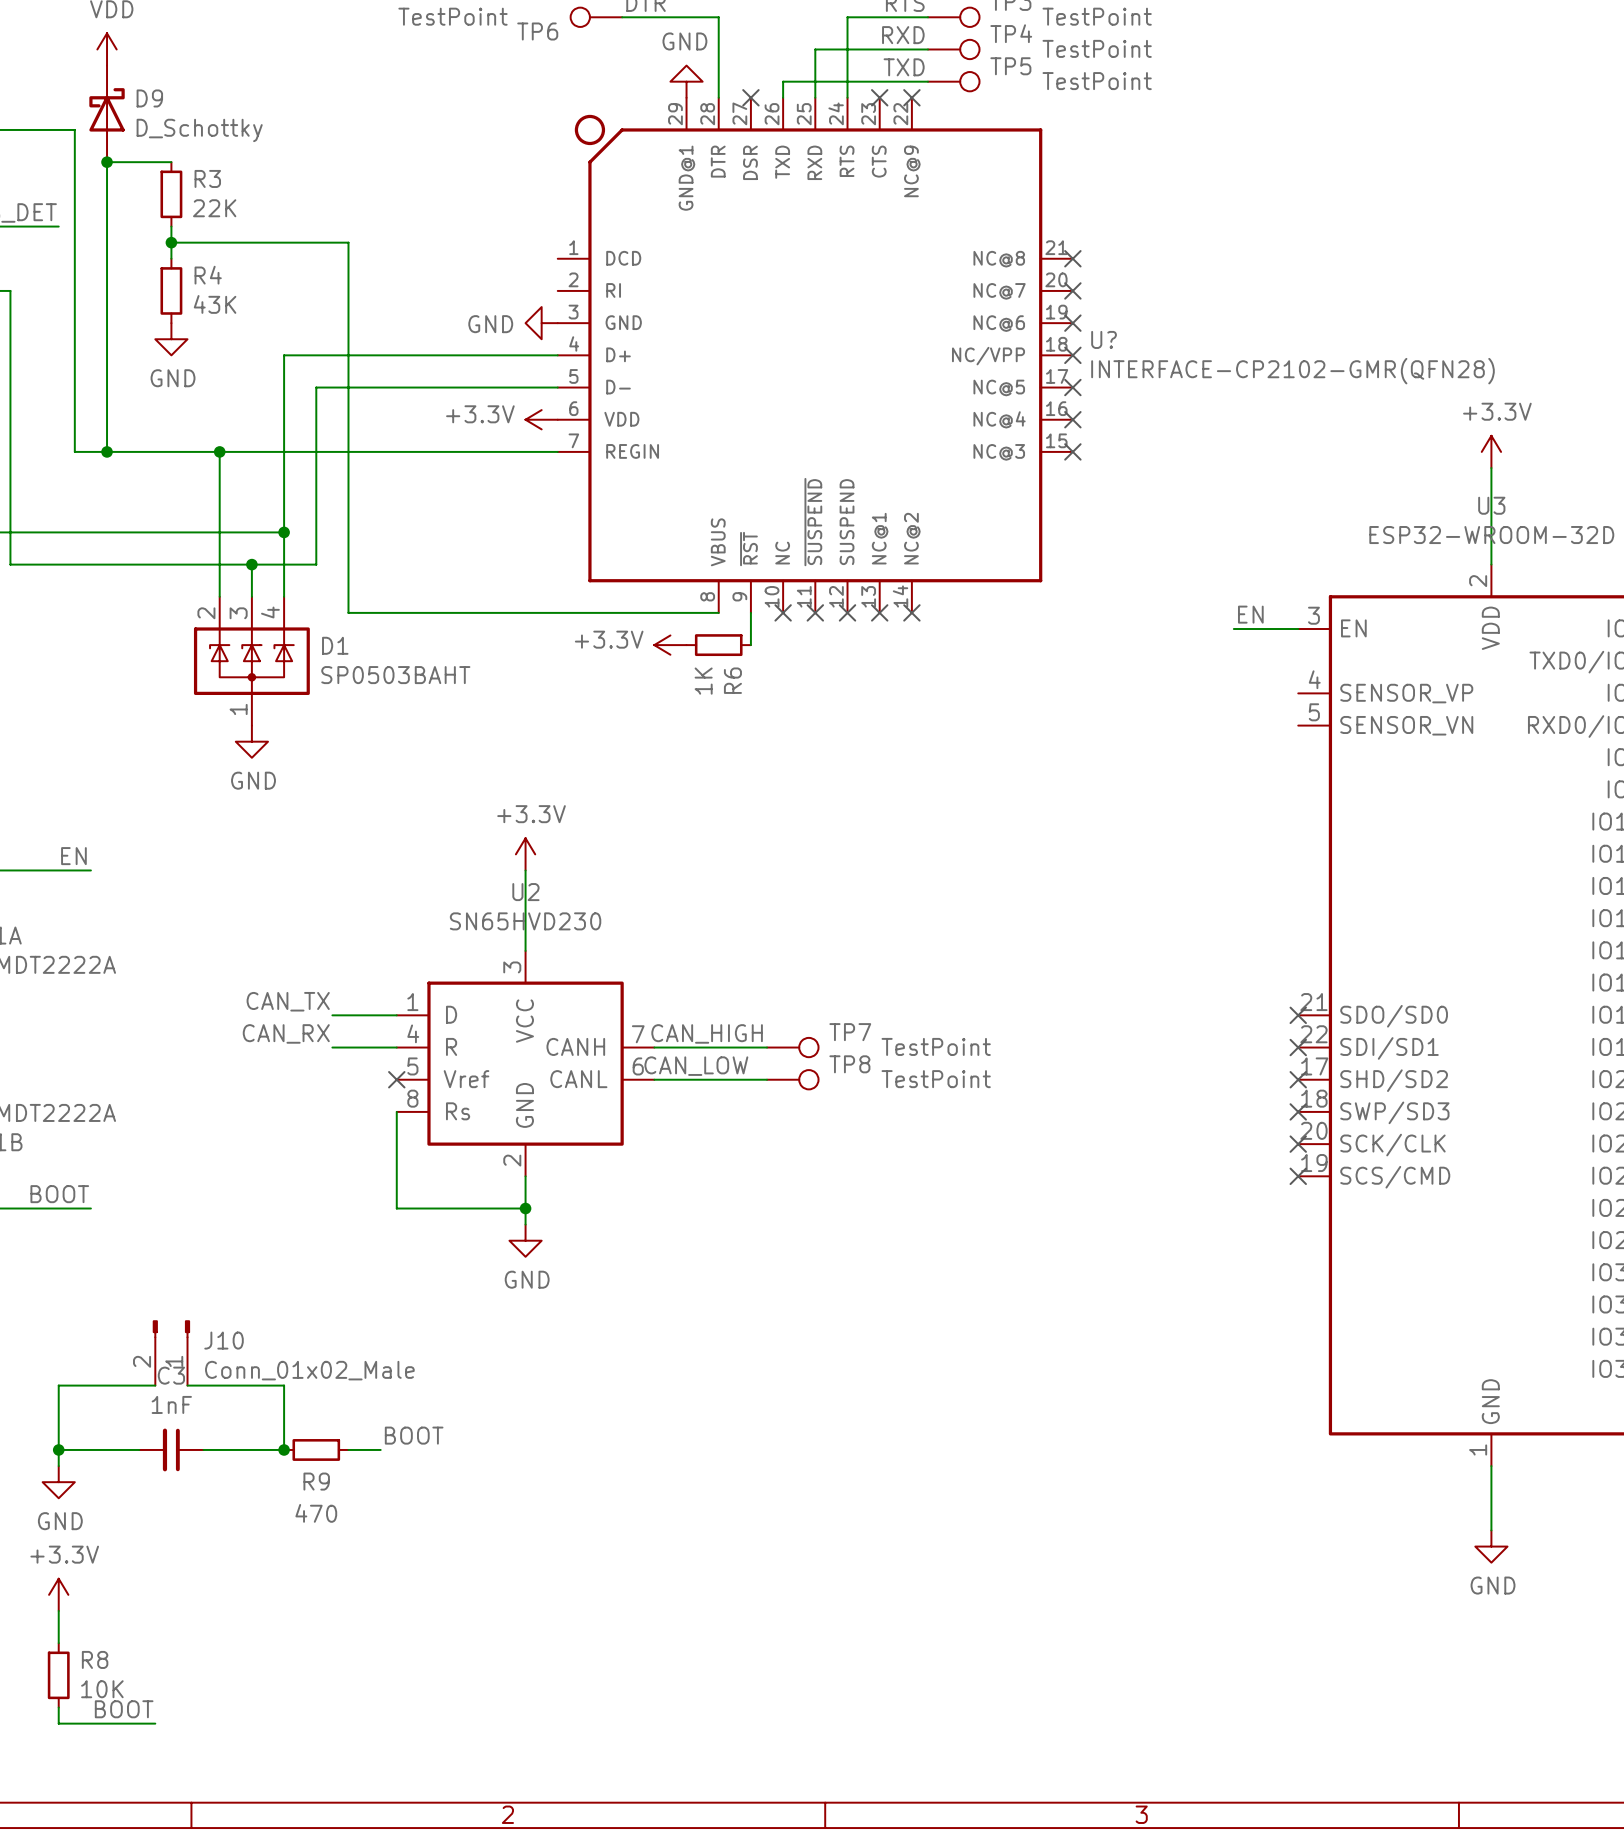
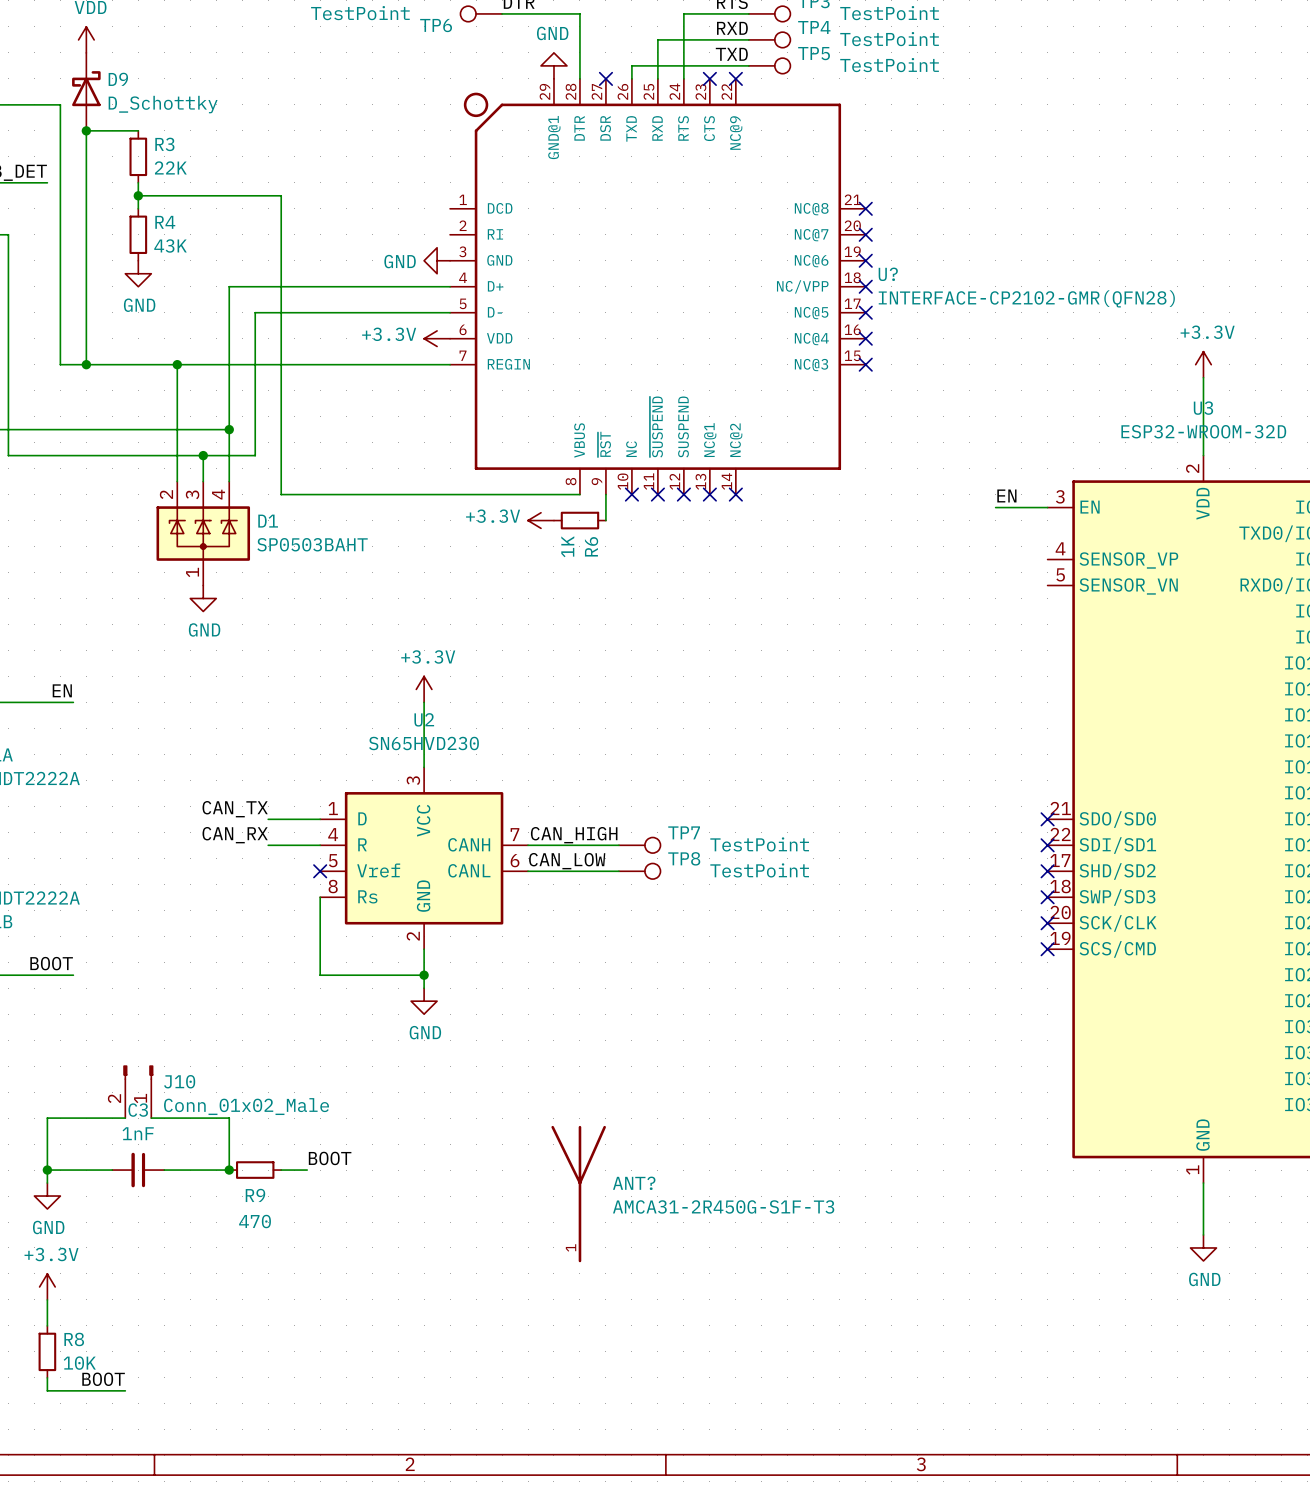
ANT?: none -> AMCA31-2R450G-S1F-T3 (578, 1194)

